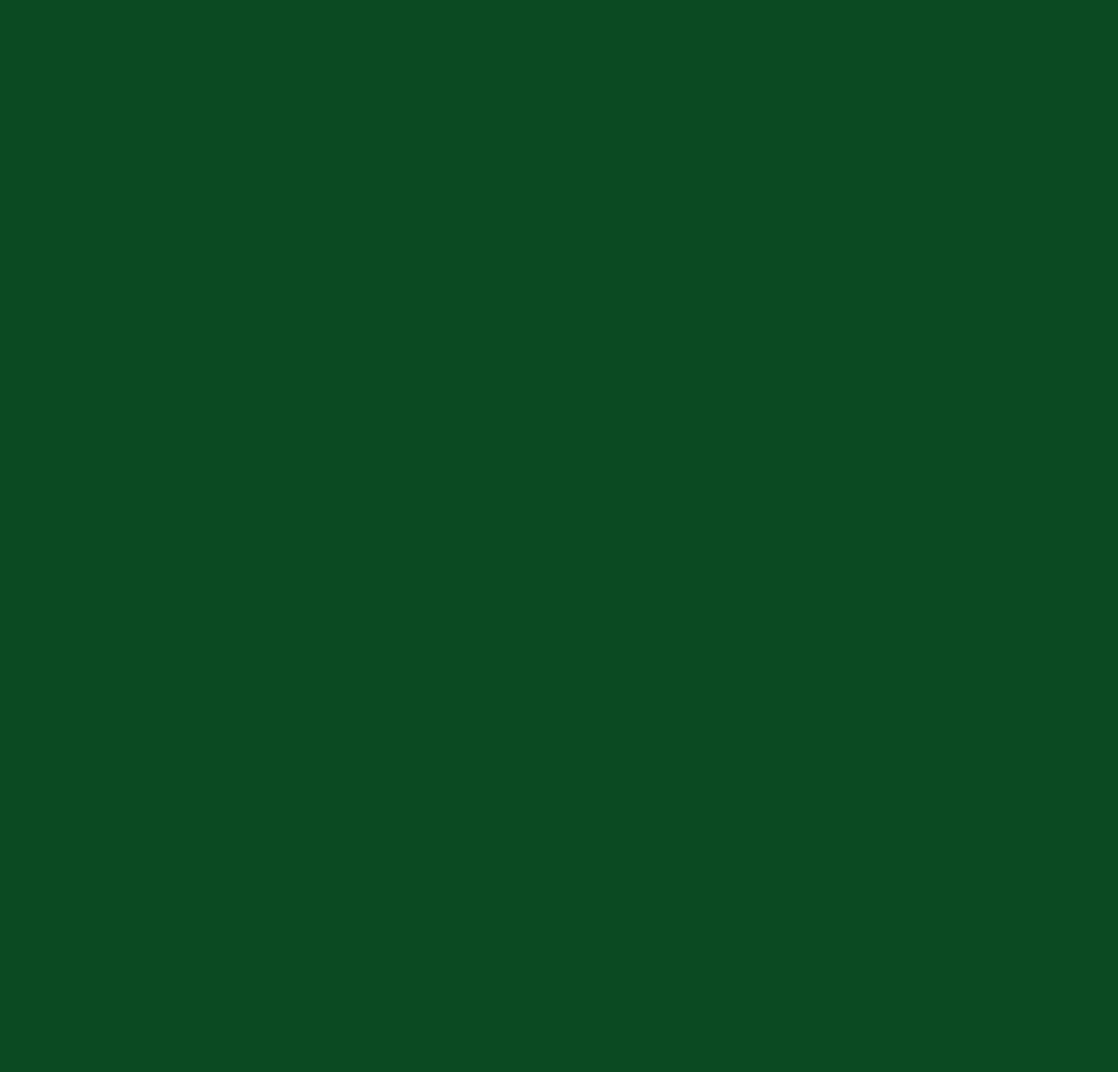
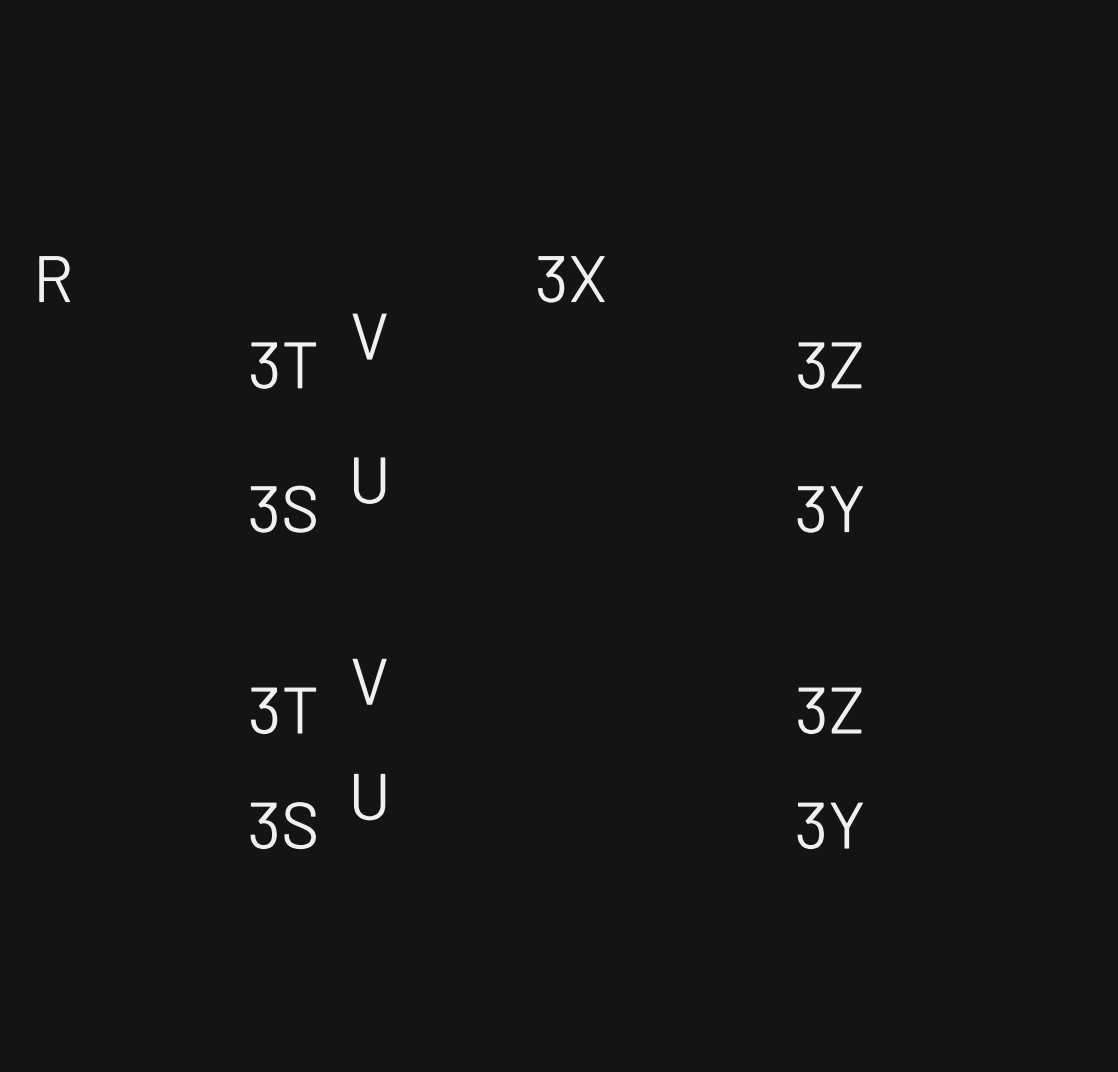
text: none -> R (54, 279)
text: none -> 3X (571, 279)
text: none -> V (369, 336)
text: none -> 3T (283, 365)
text: none -> 3Z (829, 365)
text: none -> U (369, 480)
text: none -> 3S (283, 509)
text: none -> 3Y (830, 509)
text: none -> V (369, 681)
text: none -> 3T (283, 710)
text: none -> 3Z (829, 710)
text: none -> U (369, 797)
text: none -> 3S (283, 825)
text: none -> 3Y (830, 825)

